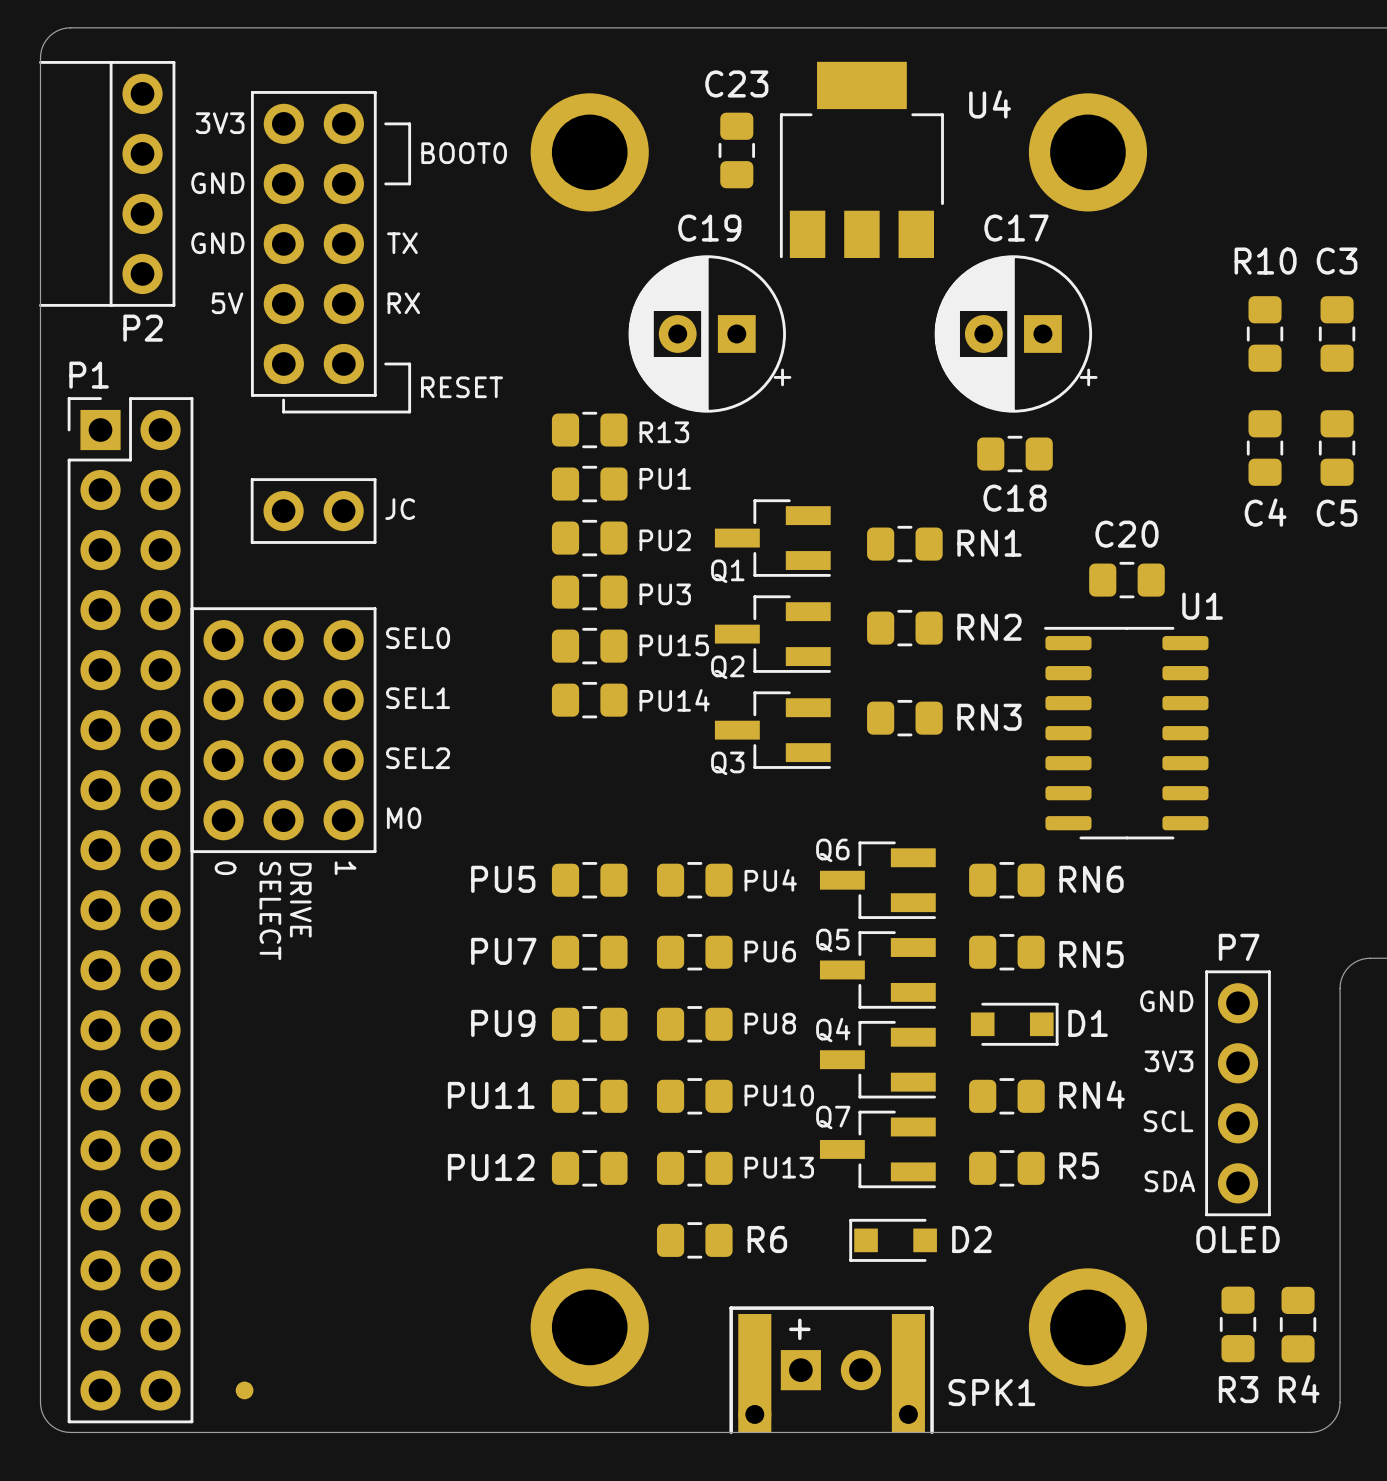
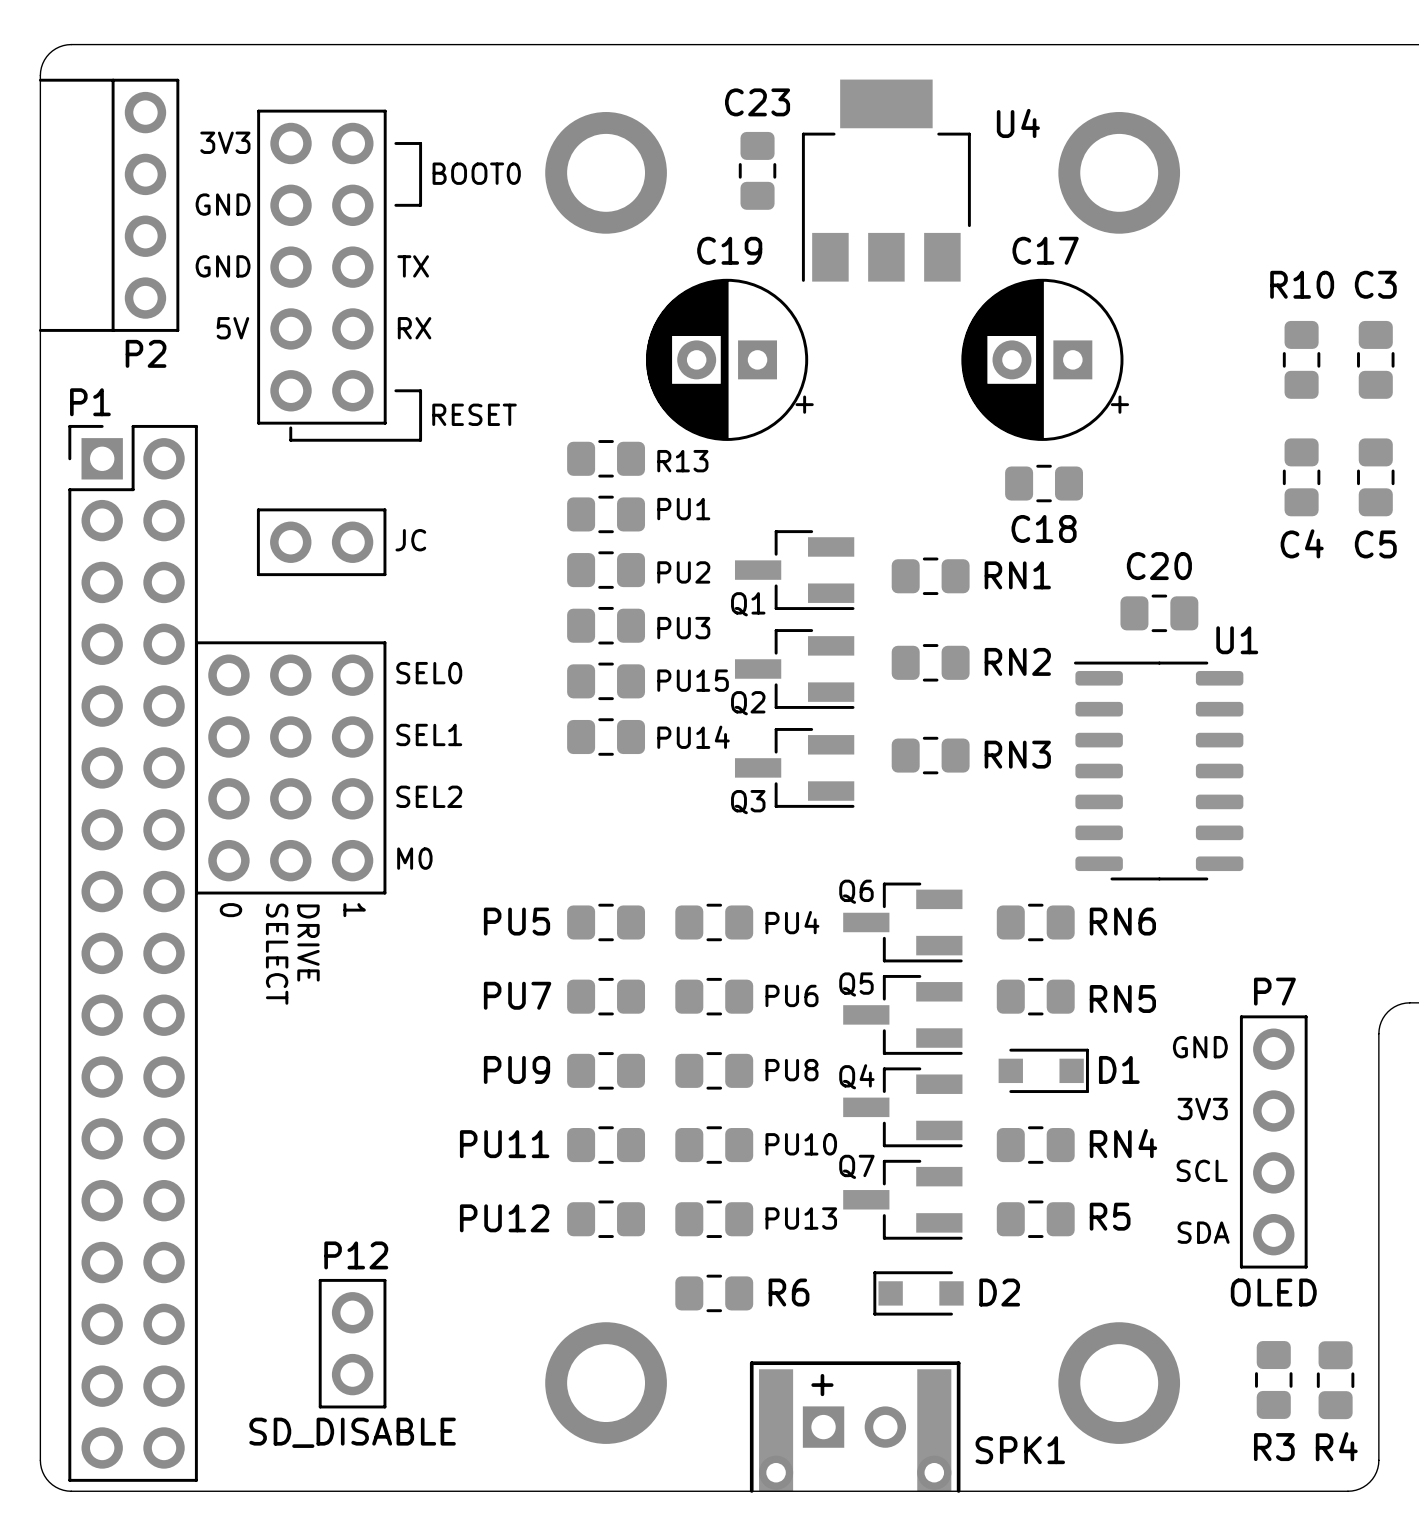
P12: none -> SD_DISABLE (352, 1343)
part: (244, 1390) -> none

